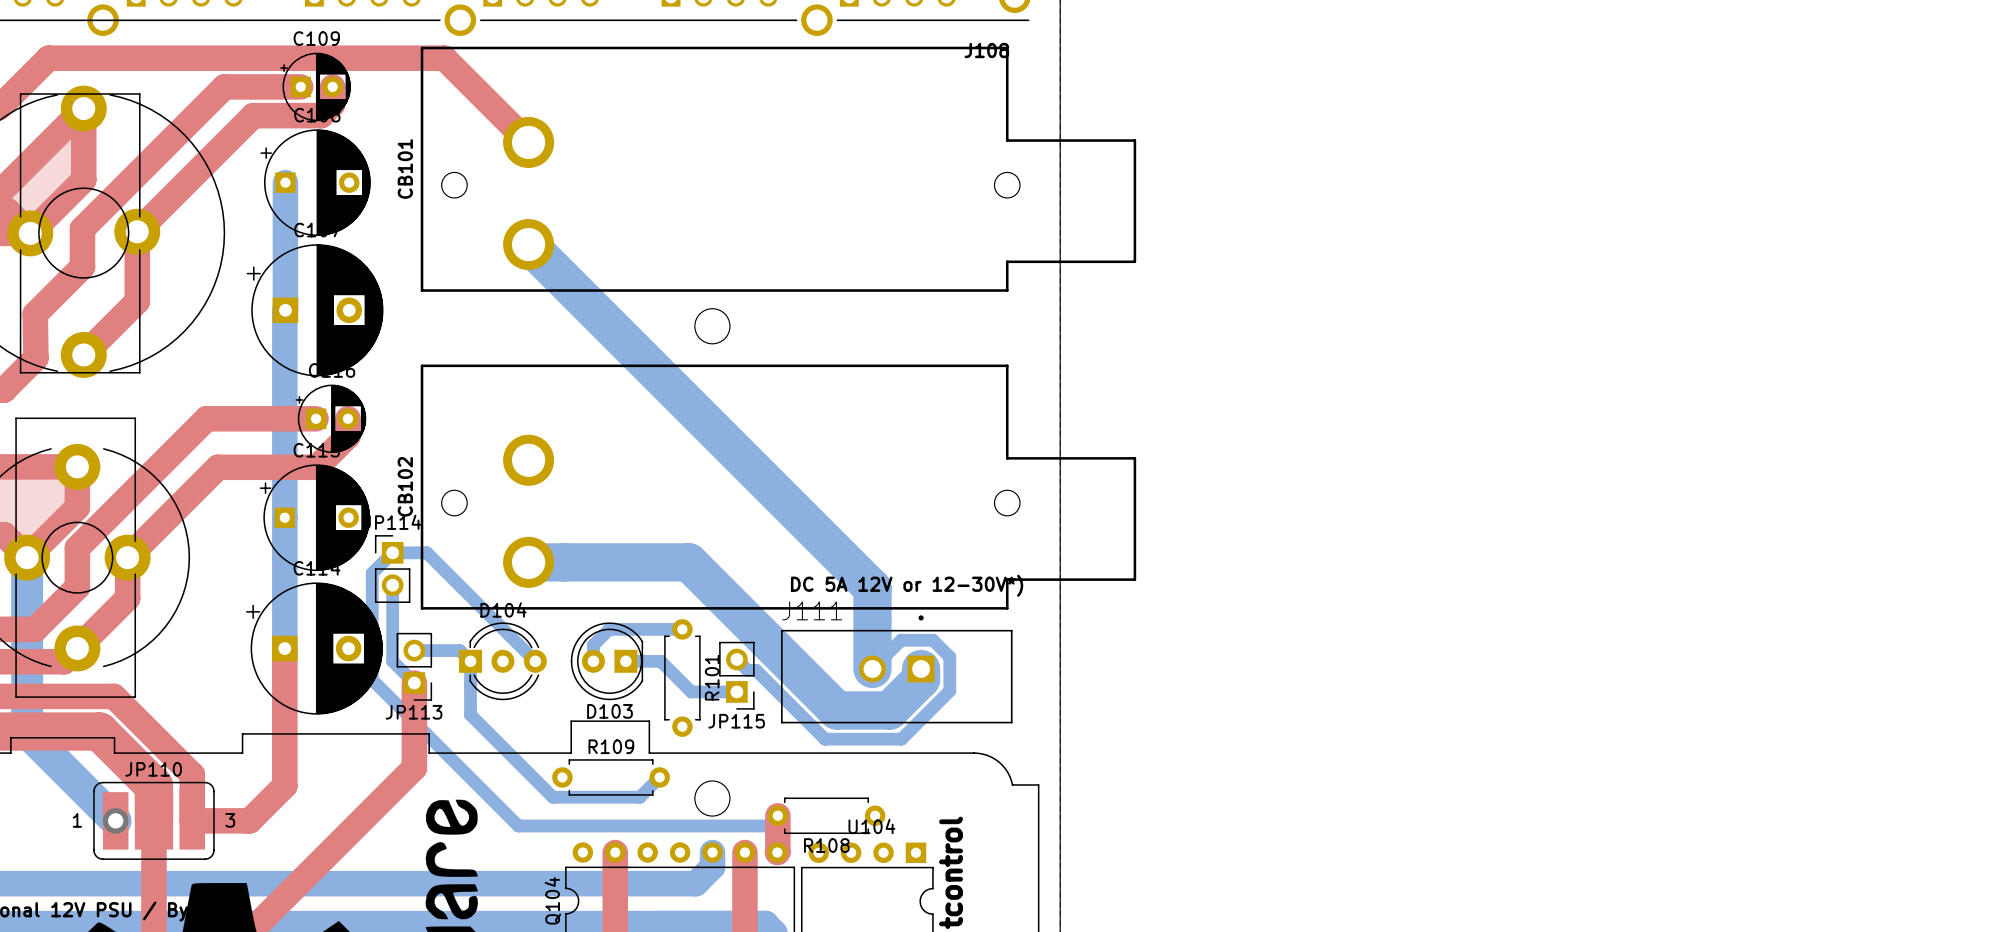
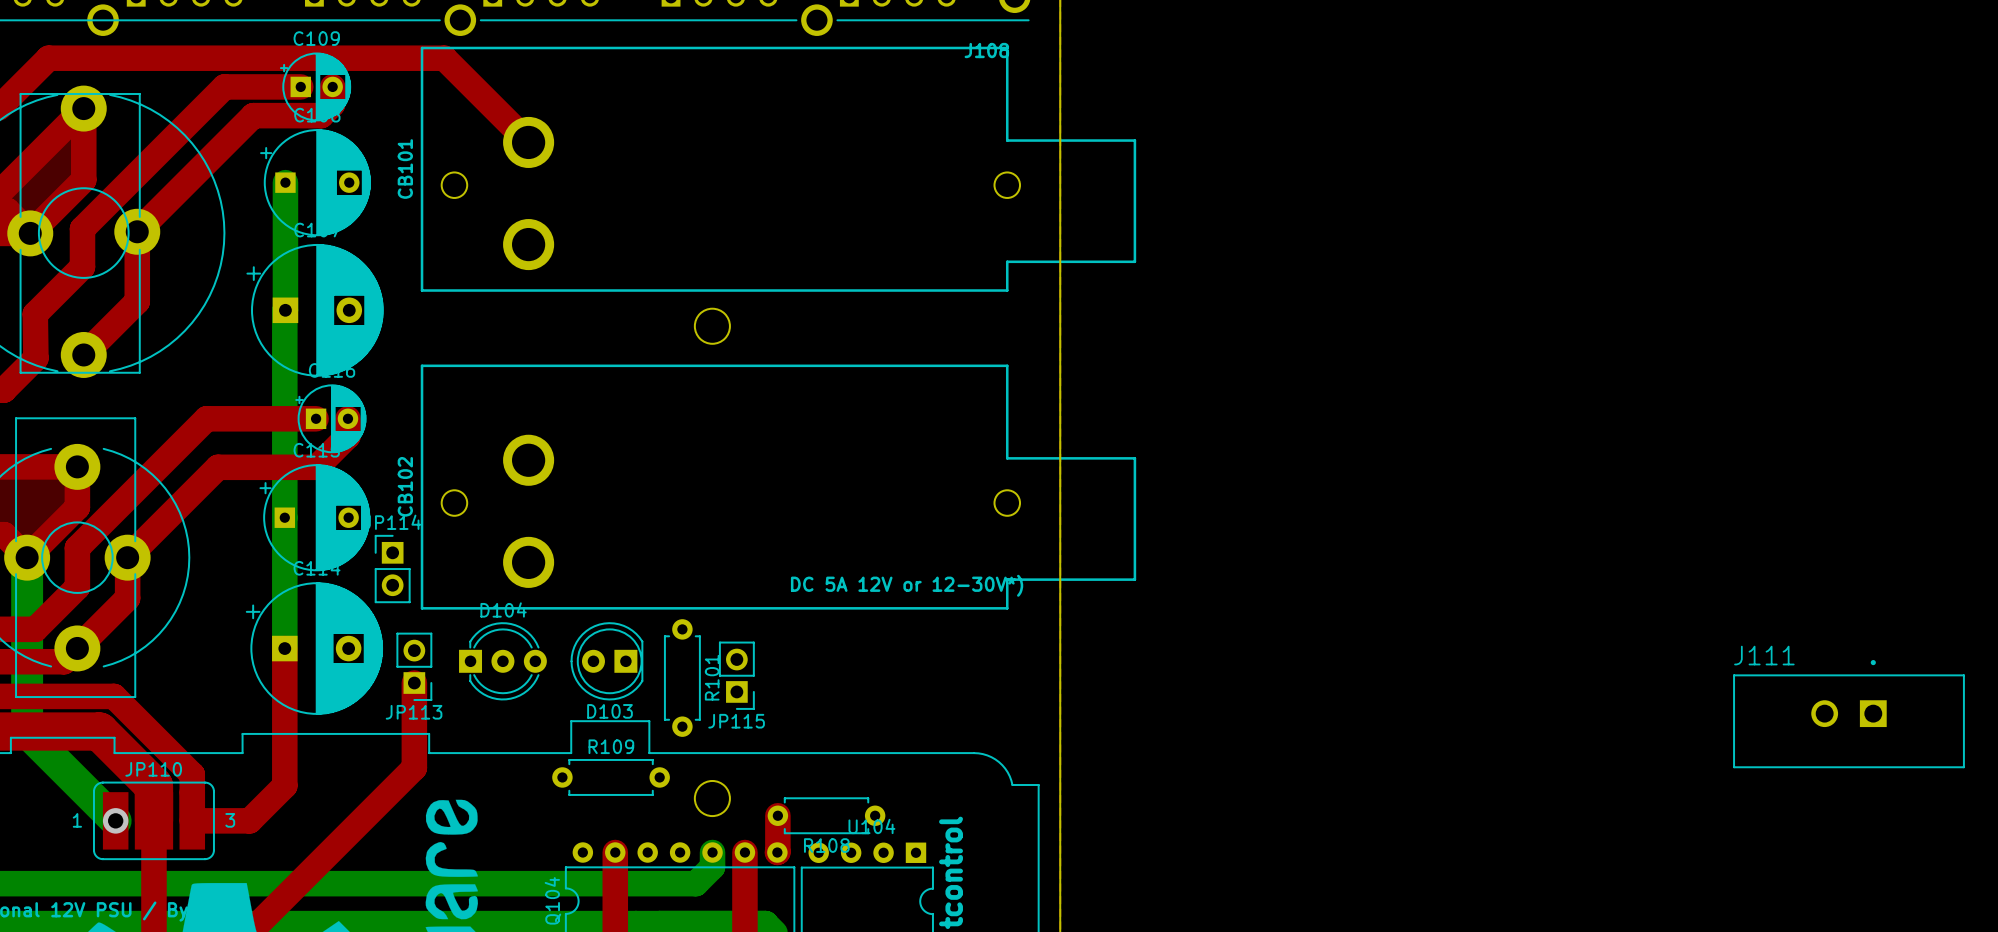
bottom track: (528, 244) (872, 588) (872, 668) (901, 640) (932, 640) (949, 657) (949, 690) (901, 739) (825, 739) (756, 670) (747, 670) (736, 659) -> none
bottom track: (528, 562) (688, 562) (836, 710) (889, 710) (921, 679) (921, 668) -> none
bottom track: (392, 585) (392, 661) (414, 683) -> none
bottom track: (682, 629) (609, 629) (593, 645) (593, 661) -> none
bottom track: (414, 650) (459, 650) (470, 661) (470, 714) (552, 797) (639, 797) (659, 777) -> none
bottom track: (535, 661) (426, 552) (392, 552) (372, 573) (372, 679) (518, 825) (767, 825) (777, 815) -> none
bottom track: (625, 661) (660, 661) (691, 691) (736, 691) -> none
J111 position: (896, 669) -> (1848, 714)

